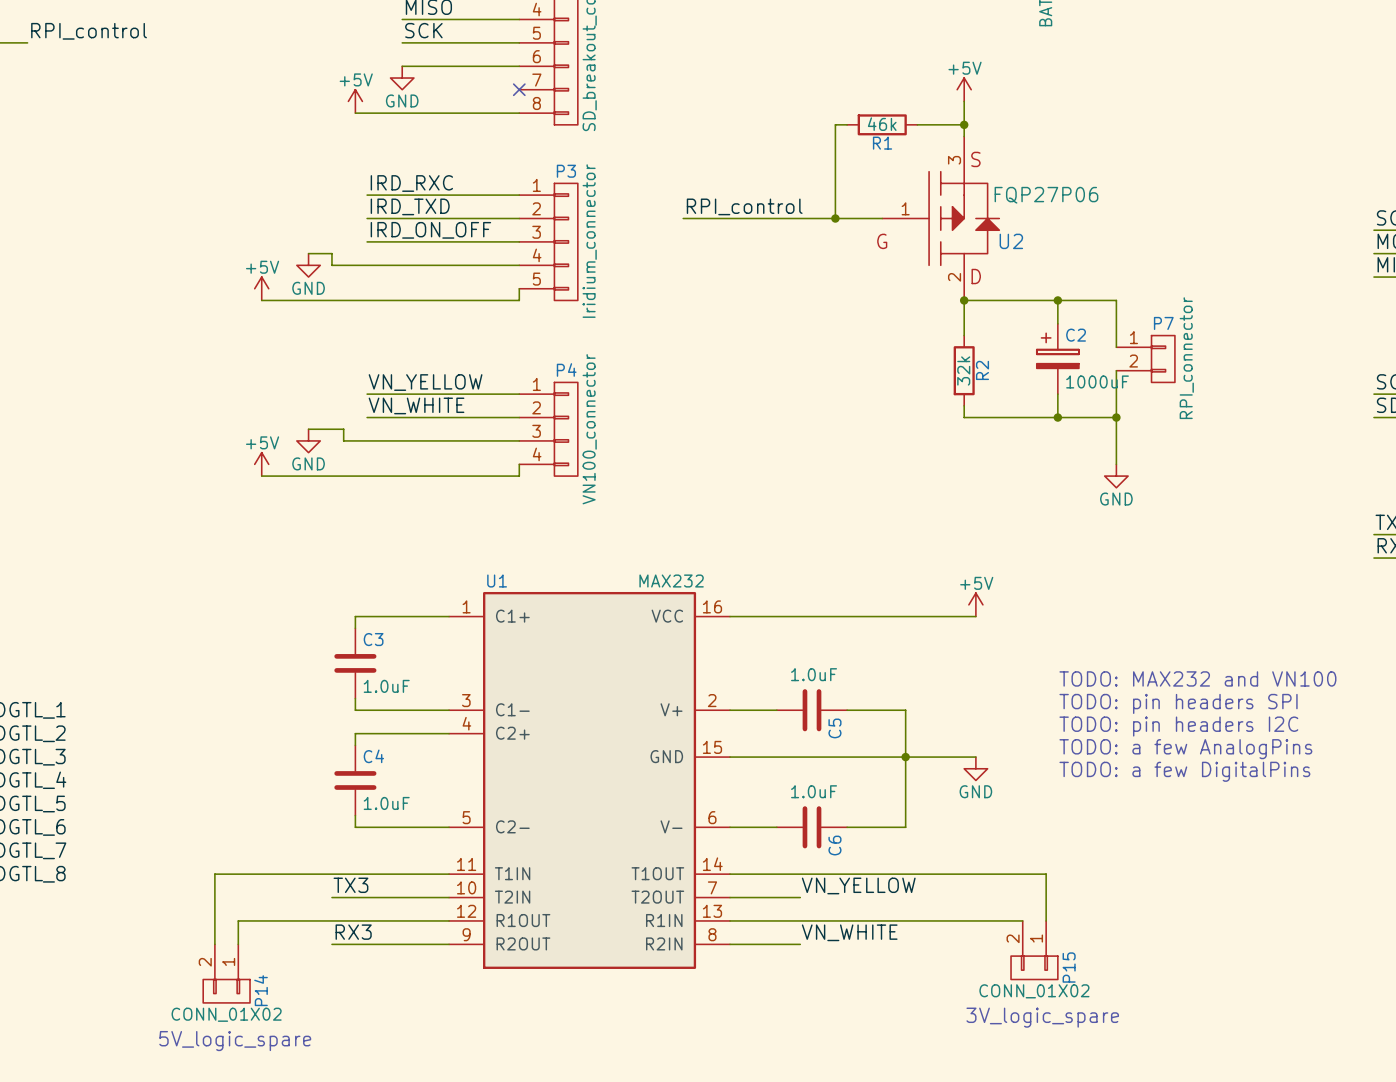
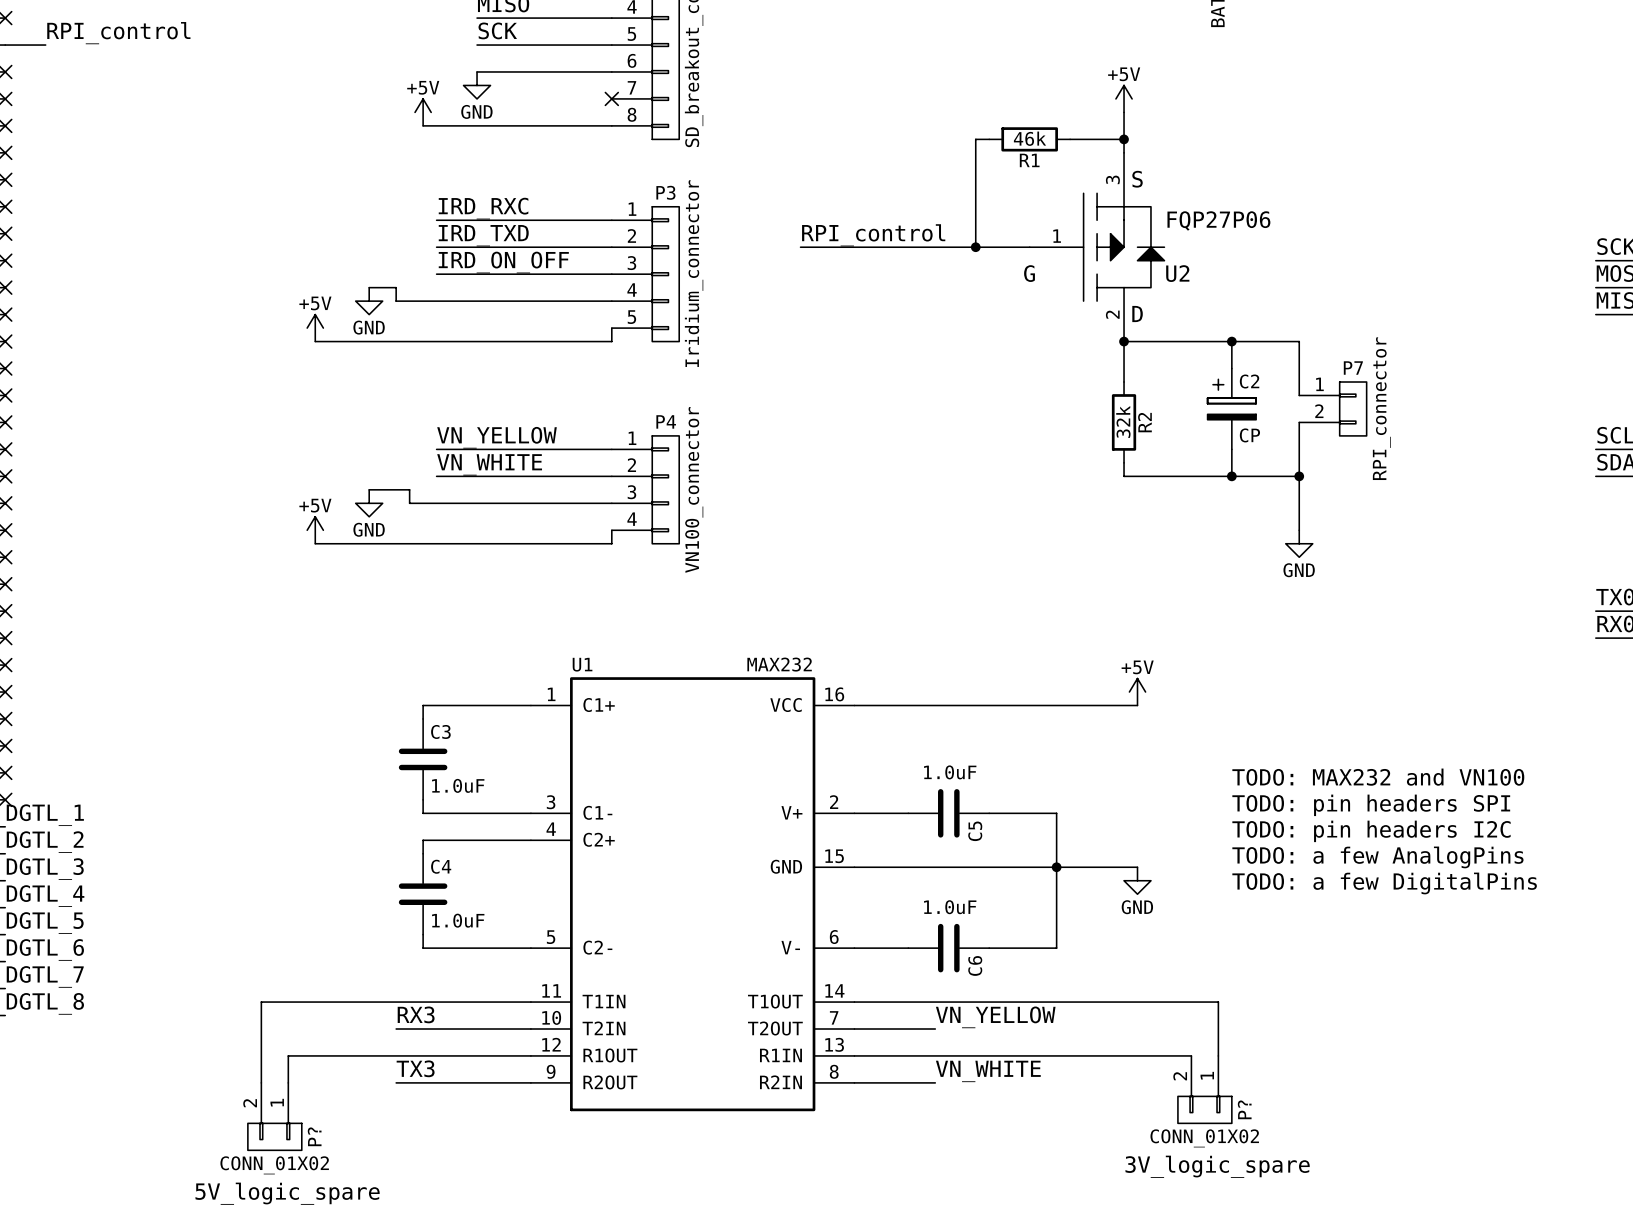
C2 value: 1000uF (1097, 381) -> CP (1249, 435)
label: TX3 (350, 885) -> RX3 (416, 1014)
label: RX3 (353, 932) -> TX3 (415, 1068)
P15 name: P15 (1069, 967) -> P? (1244, 1109)
P14 name: P14 (261, 990) -> P? (314, 1136)

